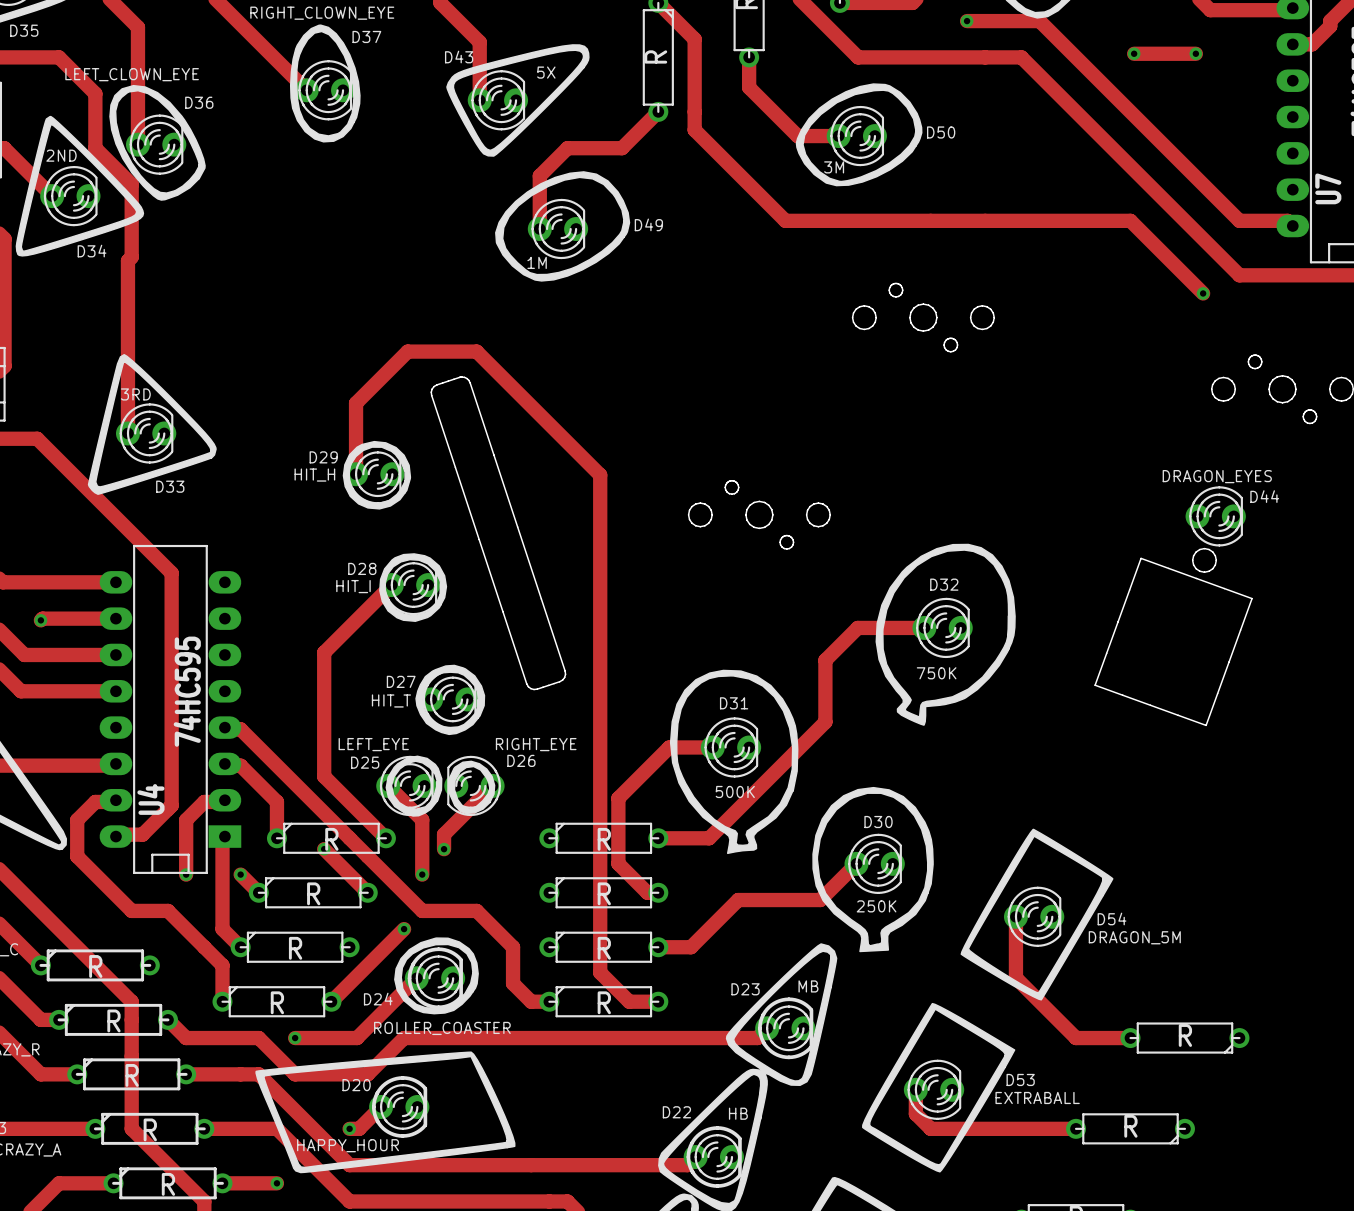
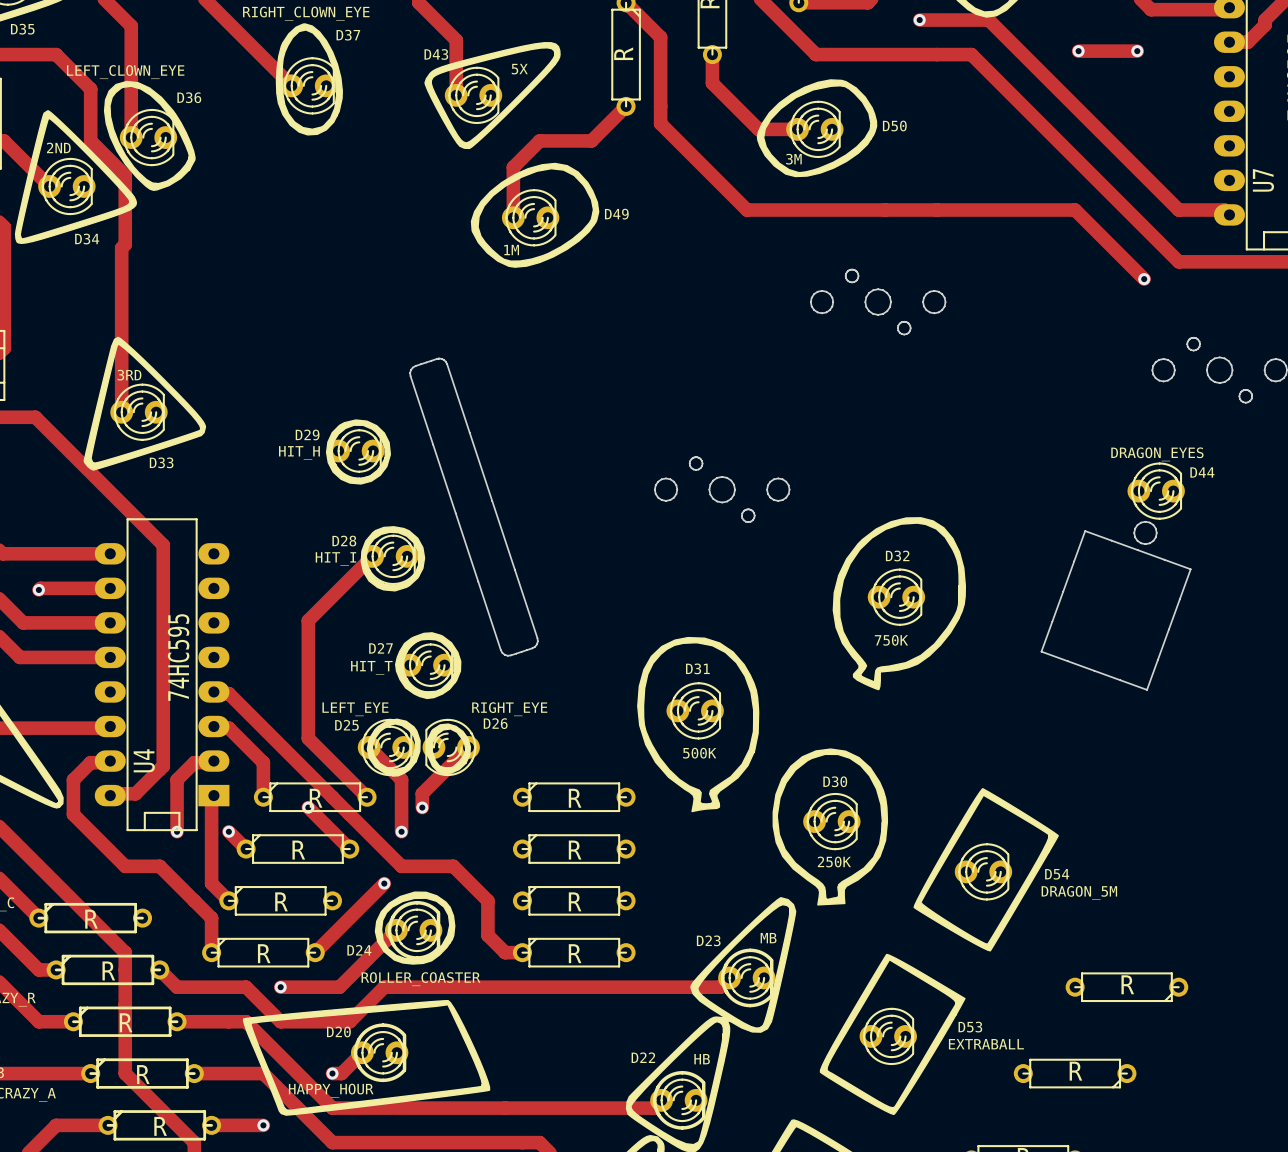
track: (356, 474) (356, 403) (407, 351) (476, 351) (600, 475) (600, 972) (629, 1001) (658, 1001) -> none
track: (924, 627) (857, 627) (825, 660) (825, 722) (709, 838) (658, 838) -> none
track: (712, 747) (669, 747) (618, 798) (618, 863) (647, 892) (658, 892) -> none
track: (856, 863) (820, 900) (738, 900) (691, 947) (658, 947) -> none
track: (1015, 916) (1015, 977) (1076, 1038) (1130, 1038) -> none
track: (915, 1089) (915, 1113) (930, 1128) (1076, 1128) -> none

